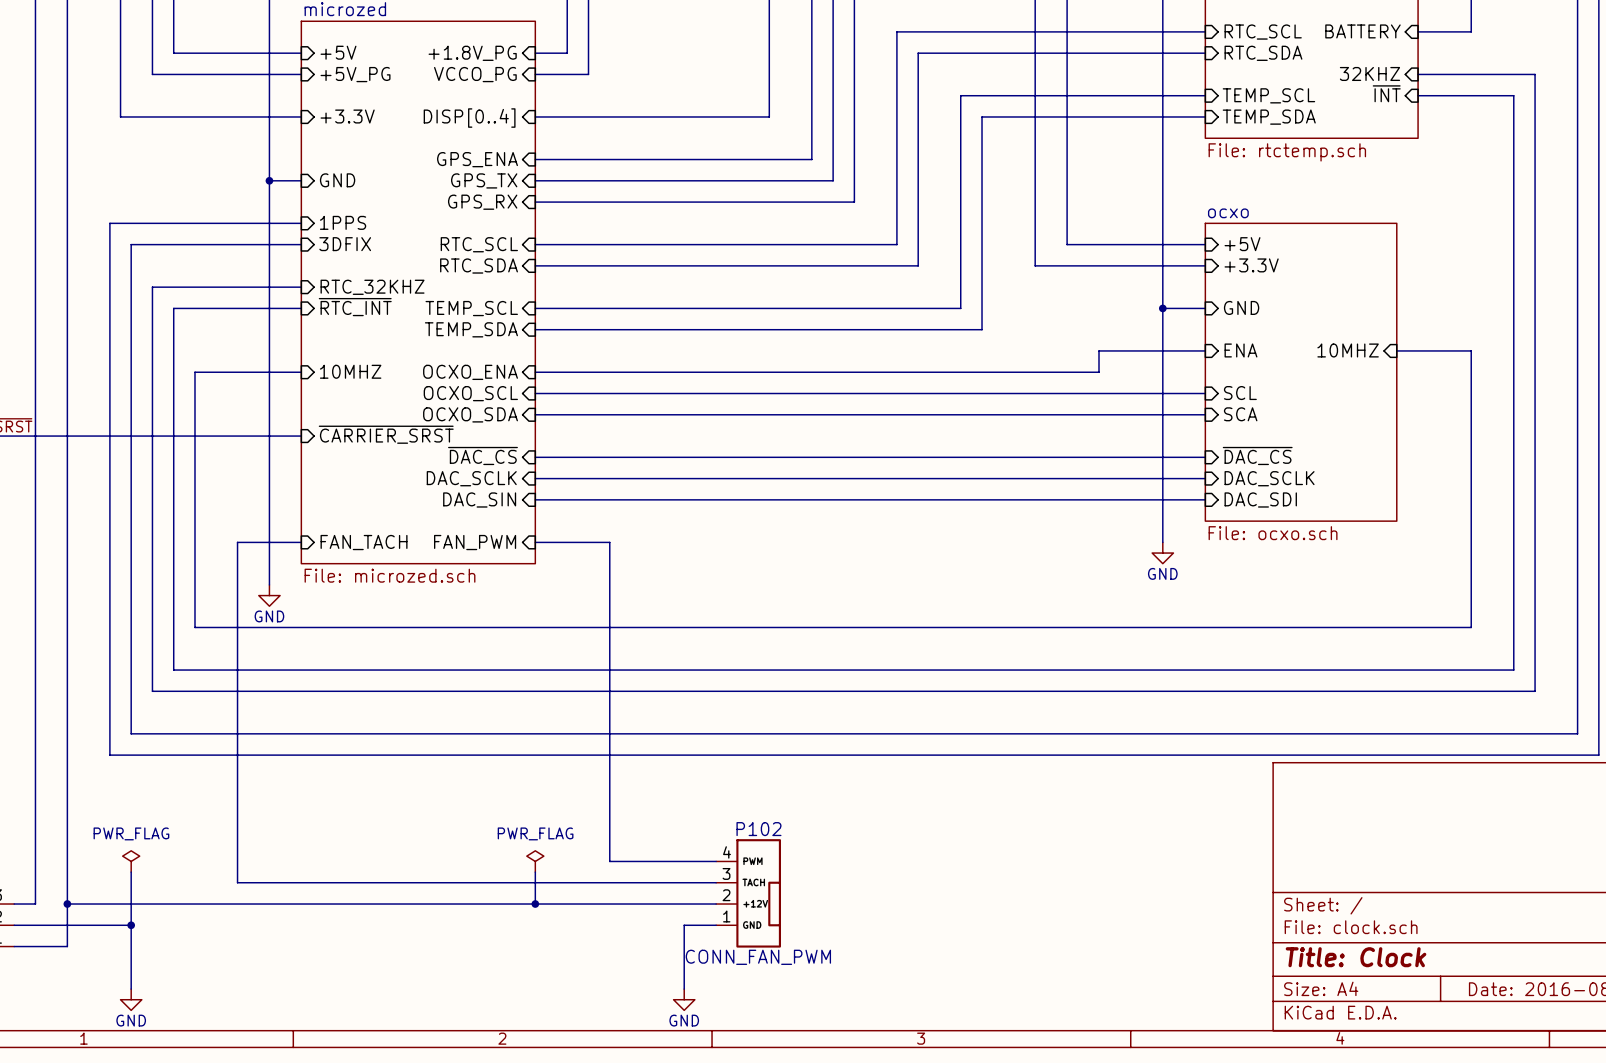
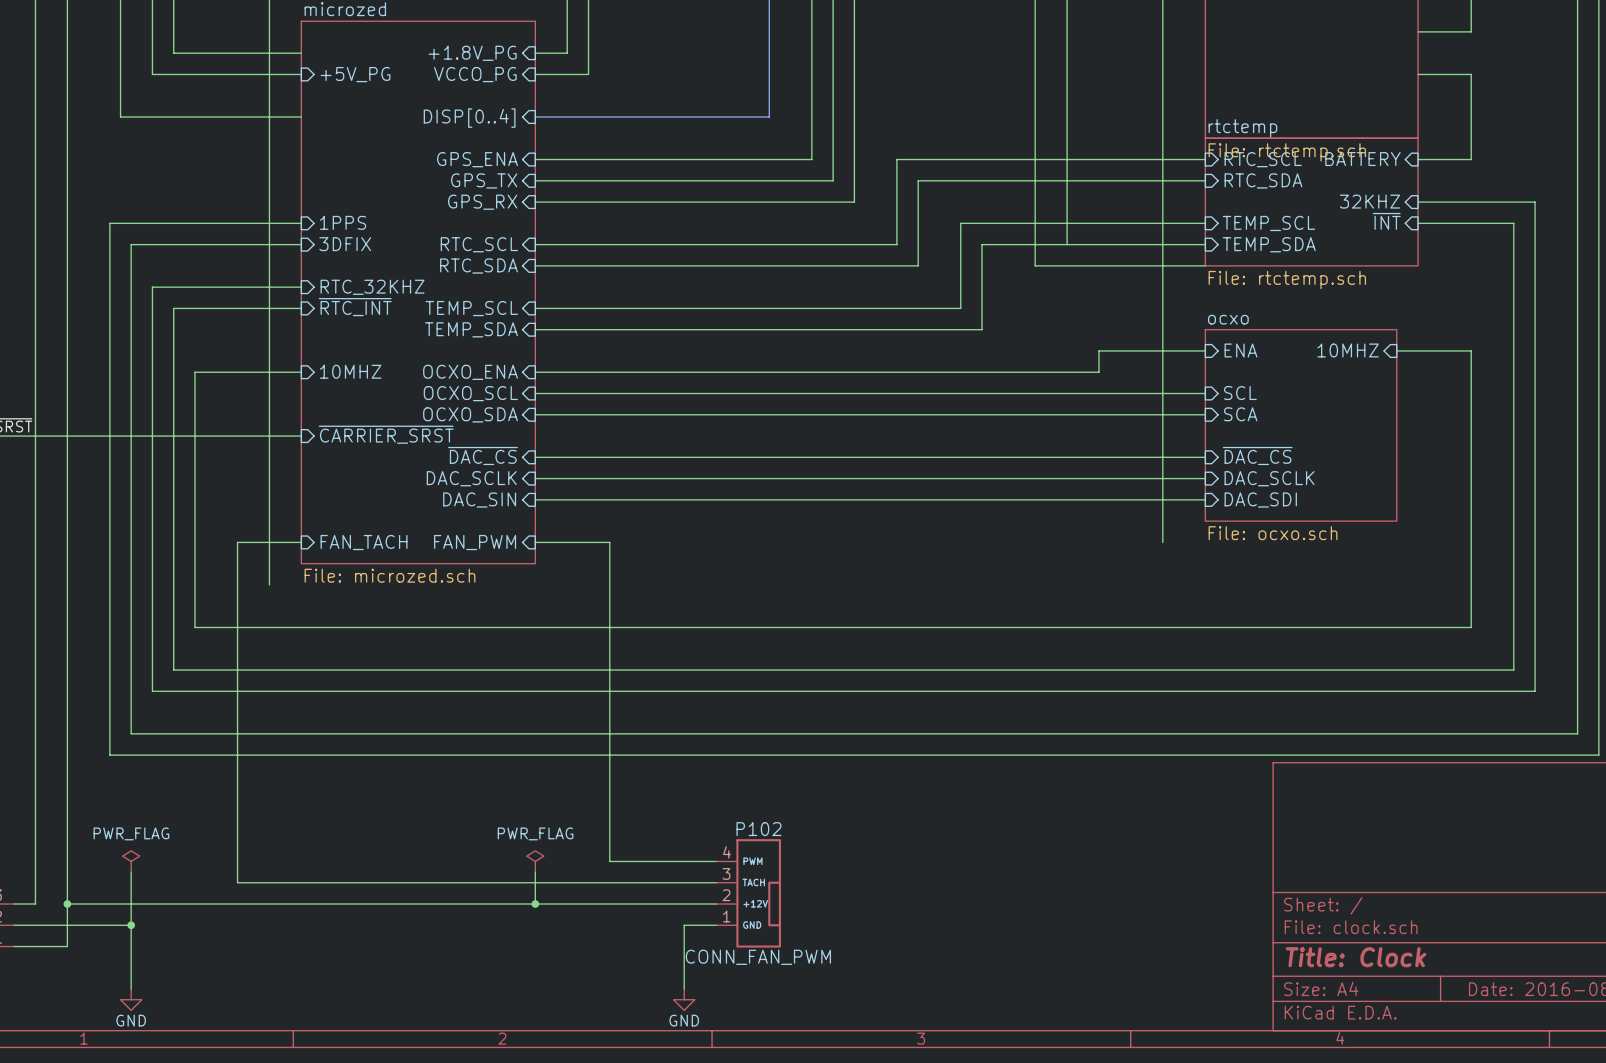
wire: (1205, 31) (896, 31) (896, 159) -> (1205, 159) (896, 159)
sheet pin position: BATTERY (1362, 31) -> BATTERY (1362, 159)
sheet pin position: RTC_SCL (1263, 32) -> RTC_SCL (1263, 159)
sheet pin: +5V (338, 52) -> none
wire: (1205, 53) (918, 53) (918, 180) -> (1205, 180) (918, 180)
sheet pin position: RTC_SDA (1263, 53) -> RTC_SDA (1263, 180)
sheet pin position: 32KHZ (1369, 73) -> 32KHZ (1369, 201)
wire: (1471, 74) (1535, 74) (1535, 202) -> (1471, 74) (1471, 159) (1418, 159)
sheet pin position: ~{INT} (1386, 93) -> ~{INT} (1386, 221)
wire: (1205, 95) (960, 95) (960, 223) -> (1205, 223) (960, 223)
sheet pin position: TEMP_SCL (1268, 95) -> TEMP_SCL (1268, 223)
wire: (1418, 95) (1513, 95) (1513, 223) -> (1418, 223) (1513, 223)
sheet pin: +3.3V (347, 116) -> none
wire: (1205, 116) (982, 116) (982, 244) -> (1067, 244) (982, 244)
sheet pin: TEMP_SDA (1269, 117) -> none
wire: (269, 180) (301, 180) -> none
junction: (269, 180) -> none
sheet pin: GND (337, 180) -> none
sheet rtctemp: none -> File: rtctemp.sch (1311, 202)
wire: none -> (1418, 202) (1535, 202)
sheet pin: +5V (1242, 244) -> TEMP_SDA (1269, 244)
sheet pin: +3.3V (1251, 265) -> none
sheet pin: GND (1241, 307) -> none
wire: (1162, 308) (1205, 308) -> none
junction: (1162, 308) -> none
sheet ocxo: File: ocxo.sch (1301, 372) -> none
sheet ocxo: none -> File: ocxo.sch (1301, 425)
power symbol: GND (1162, 553) -> none
power symbol: GND (269, 595) -> none

